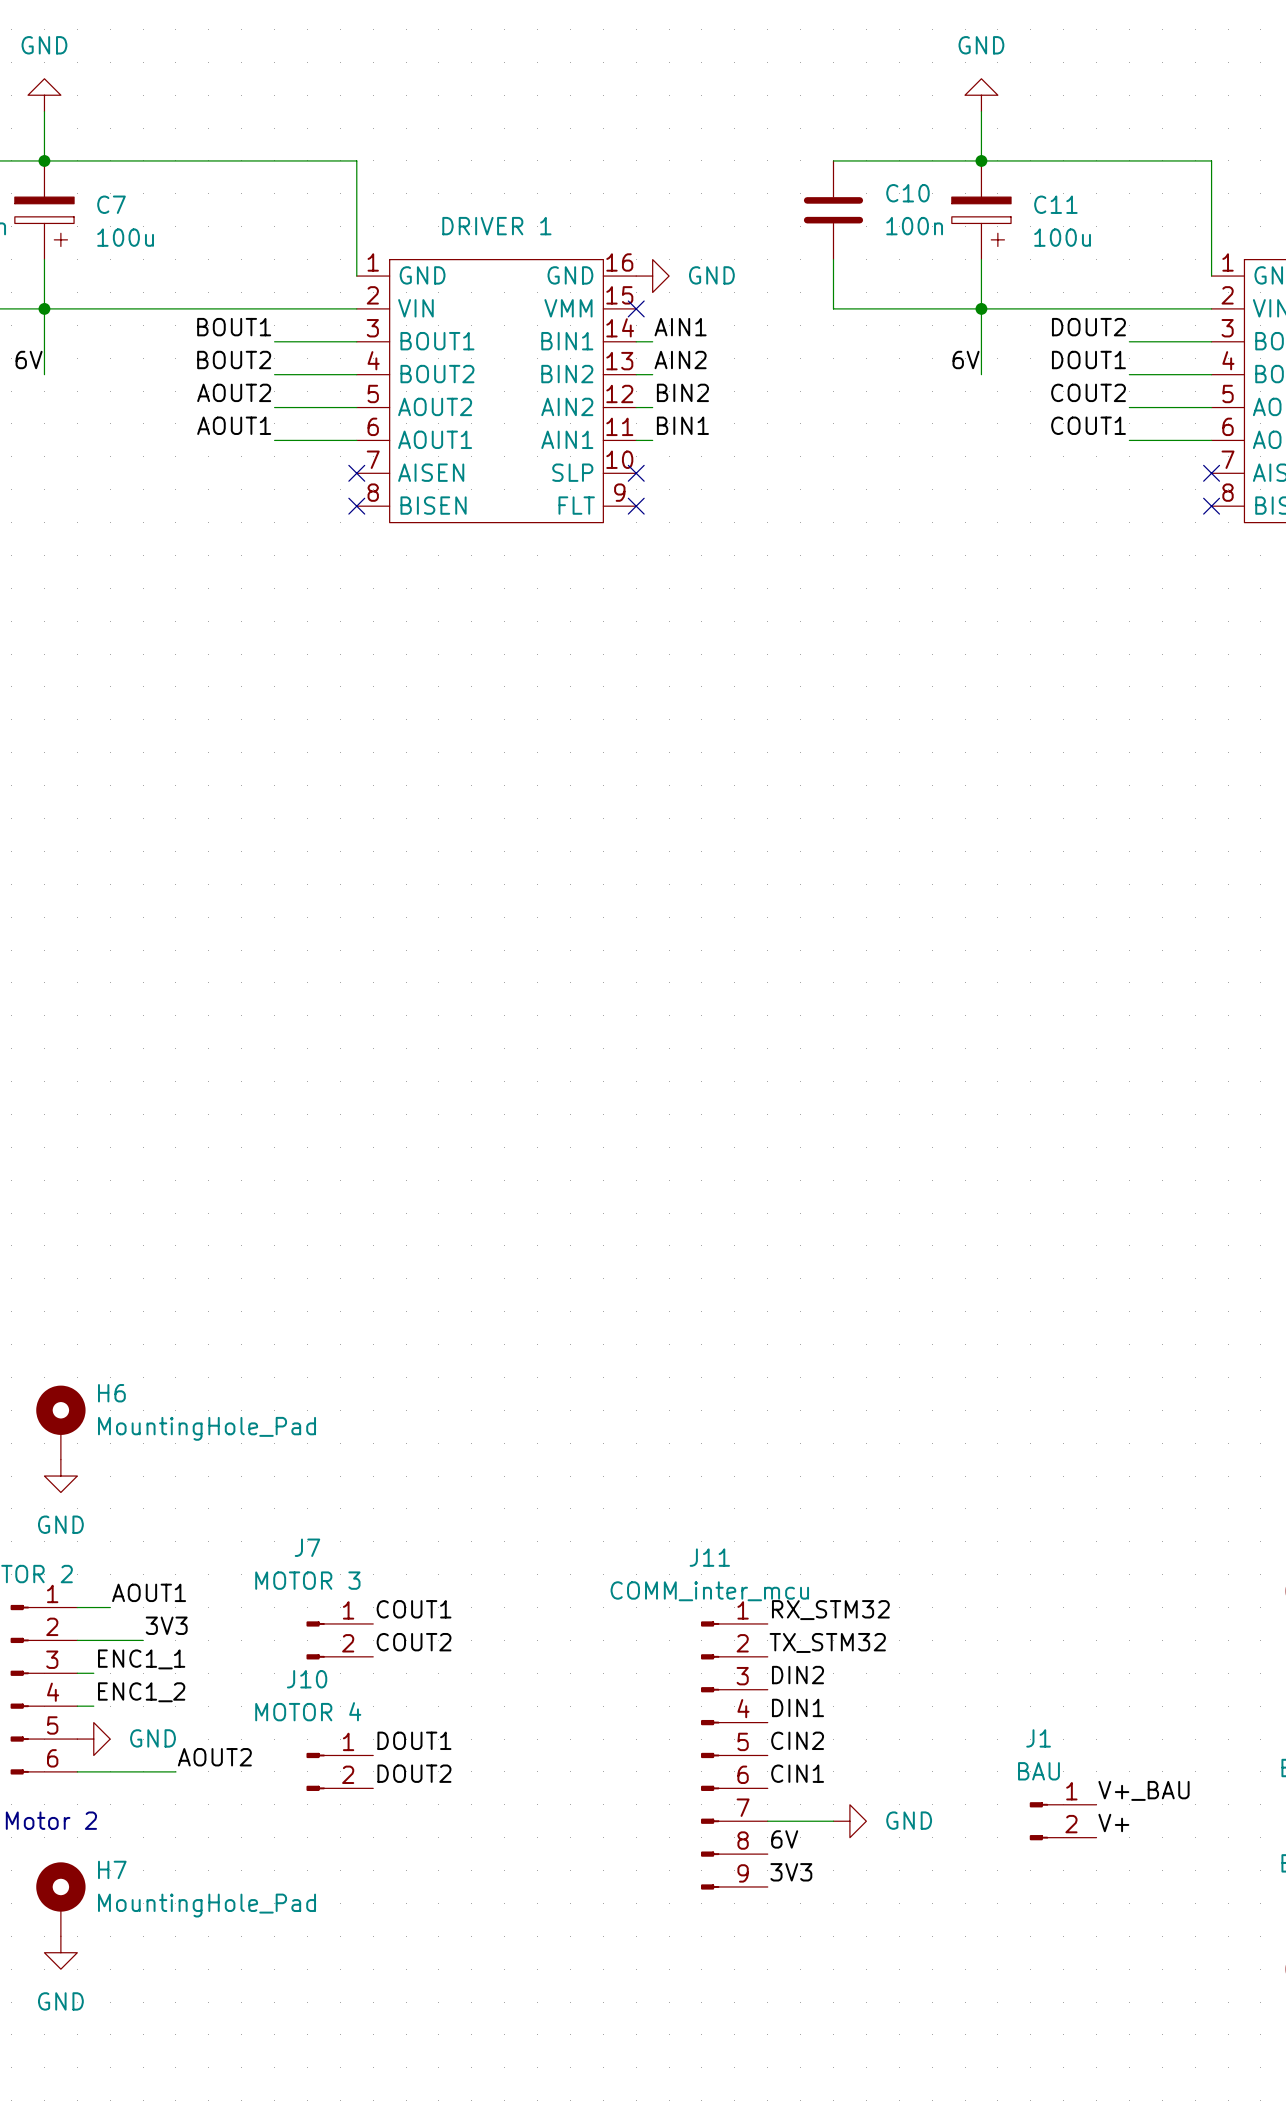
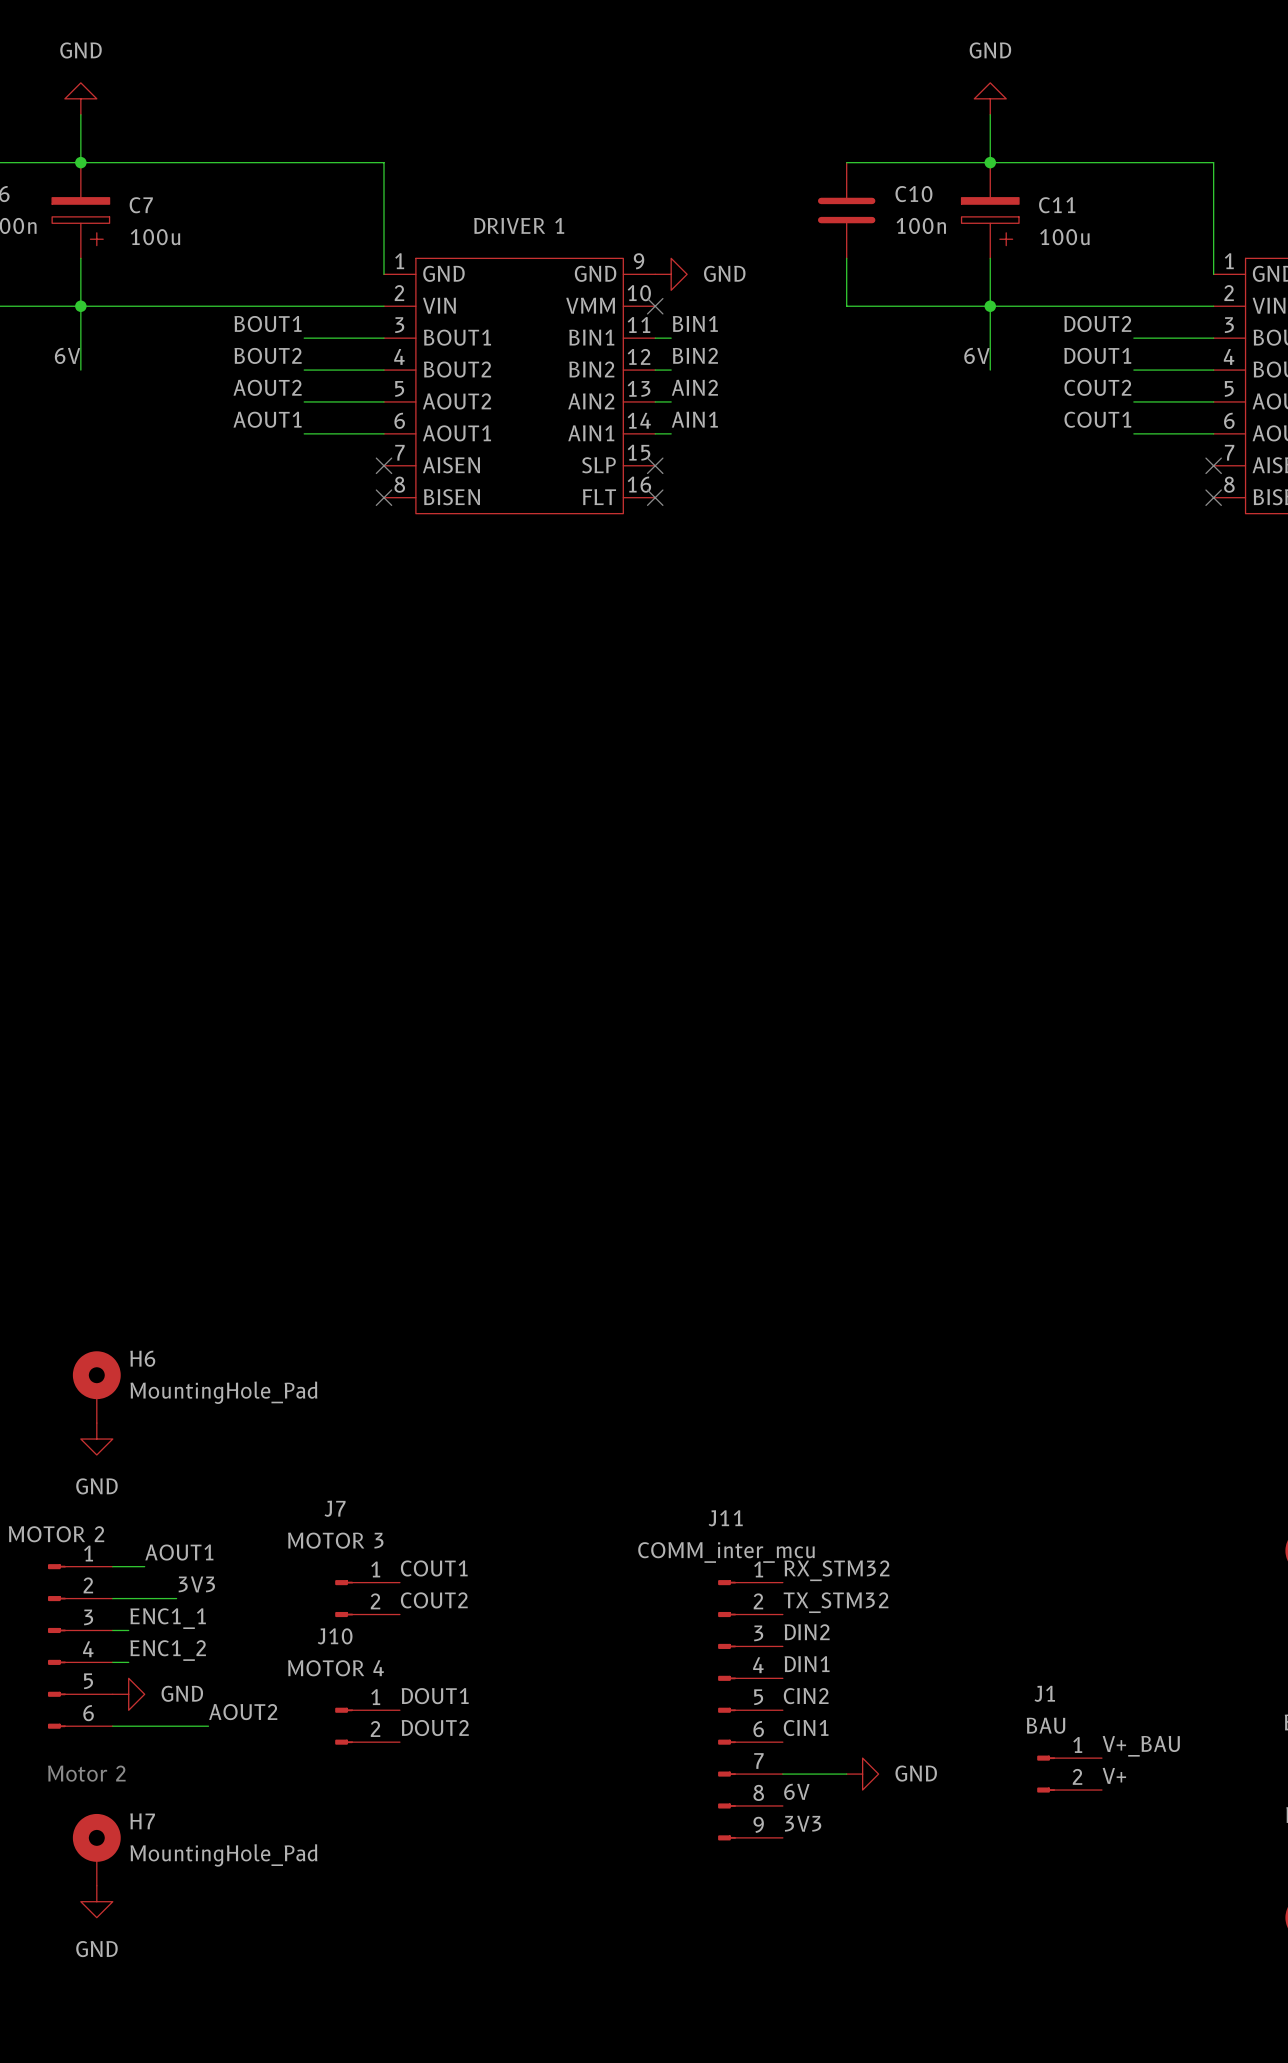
part pin number: 16 (619, 262) -> 9 (639, 261)
part pin number: 15 (619, 295) -> 10 (639, 293)
part pin number: 14 (620, 327) -> 11 (638, 324)
label: AIN1 (680, 327) -> BIN1 (695, 323)
label: AIN2 (680, 360) -> BIN2 (695, 355)
part pin number: 13 (619, 361) -> 12 (639, 356)
label: BIN2 (682, 392) -> AIN2 (694, 387)
part pin number: 12 (619, 393) -> 13 (639, 388)
label: BIN1 (682, 425) -> AIN1 (694, 419)
part pin number: 11 (619, 426) -> 14 (639, 420)
part pin number: 10 (619, 459) -> 15 (638, 452)
part pin number: 9 (619, 492) -> 16 (639, 484)

